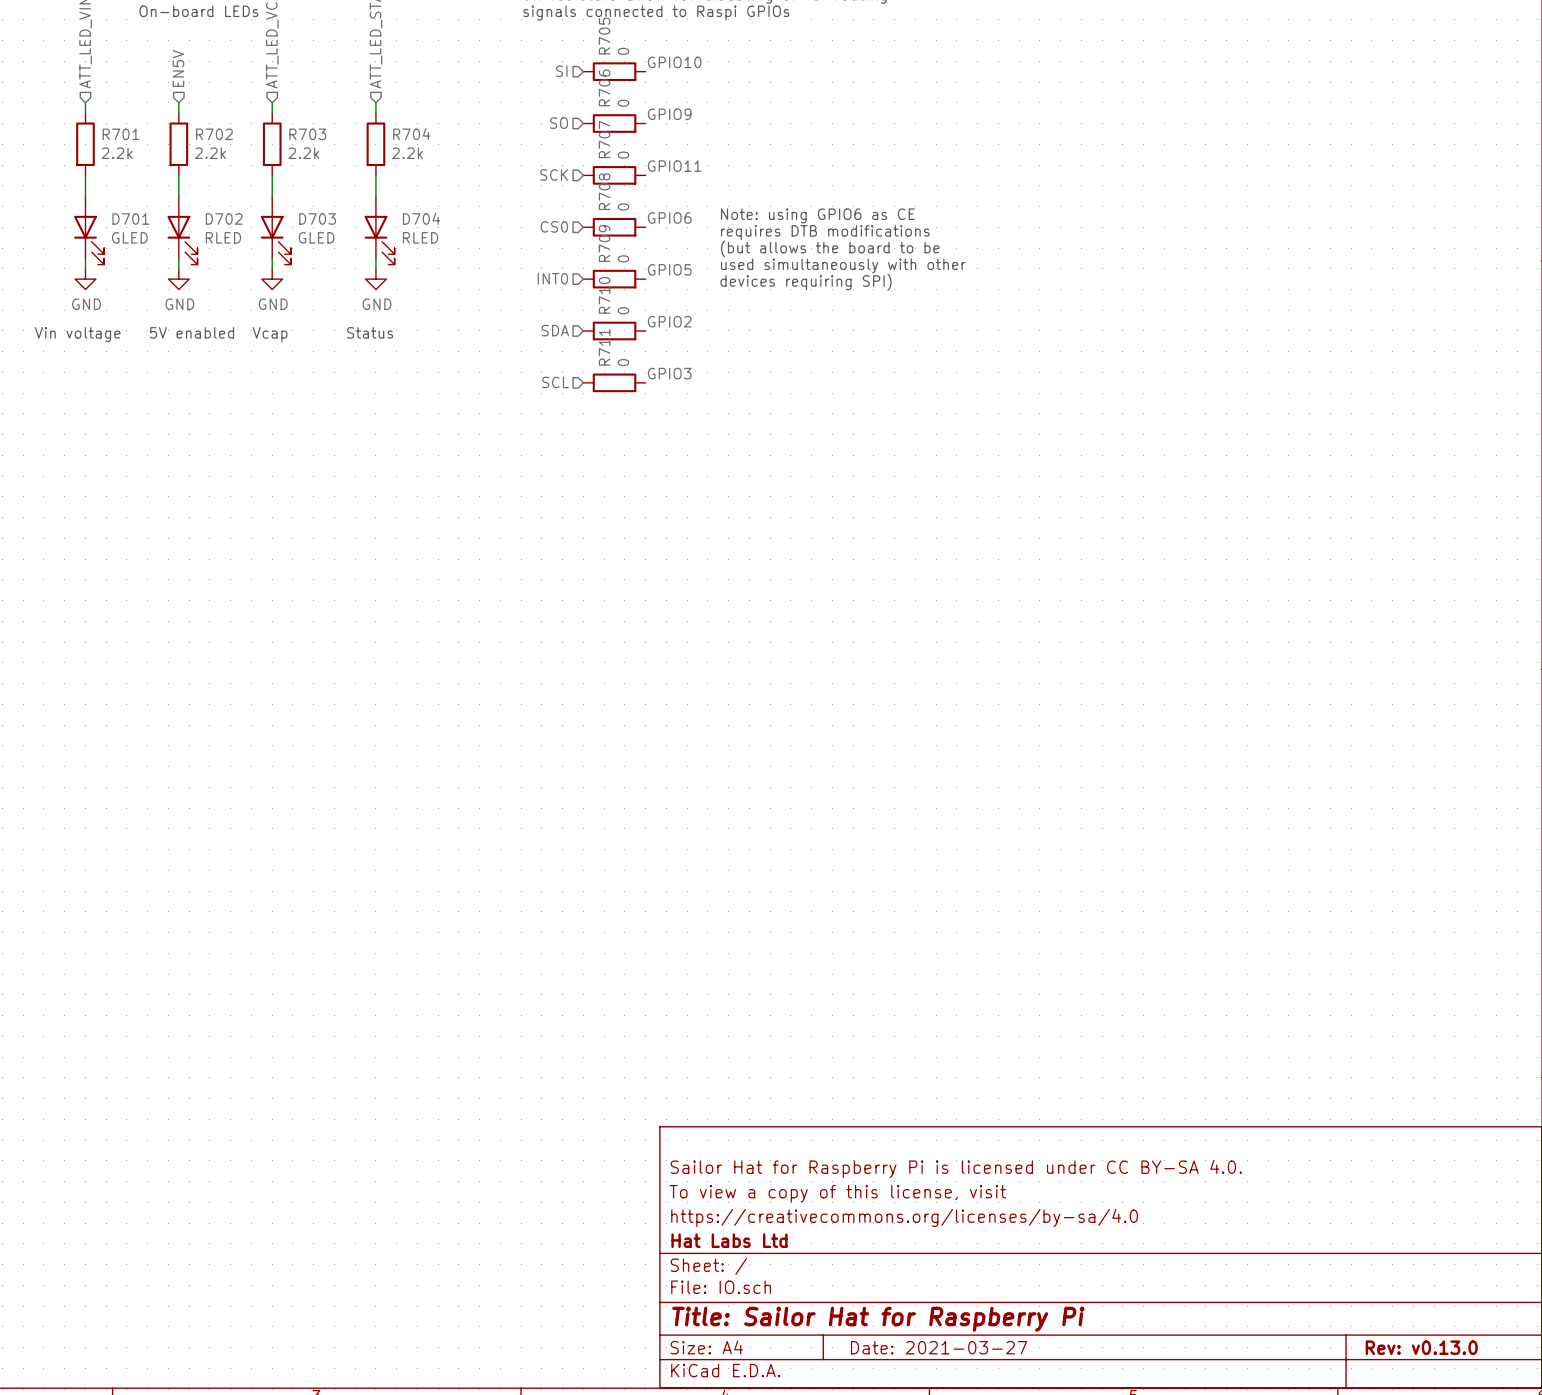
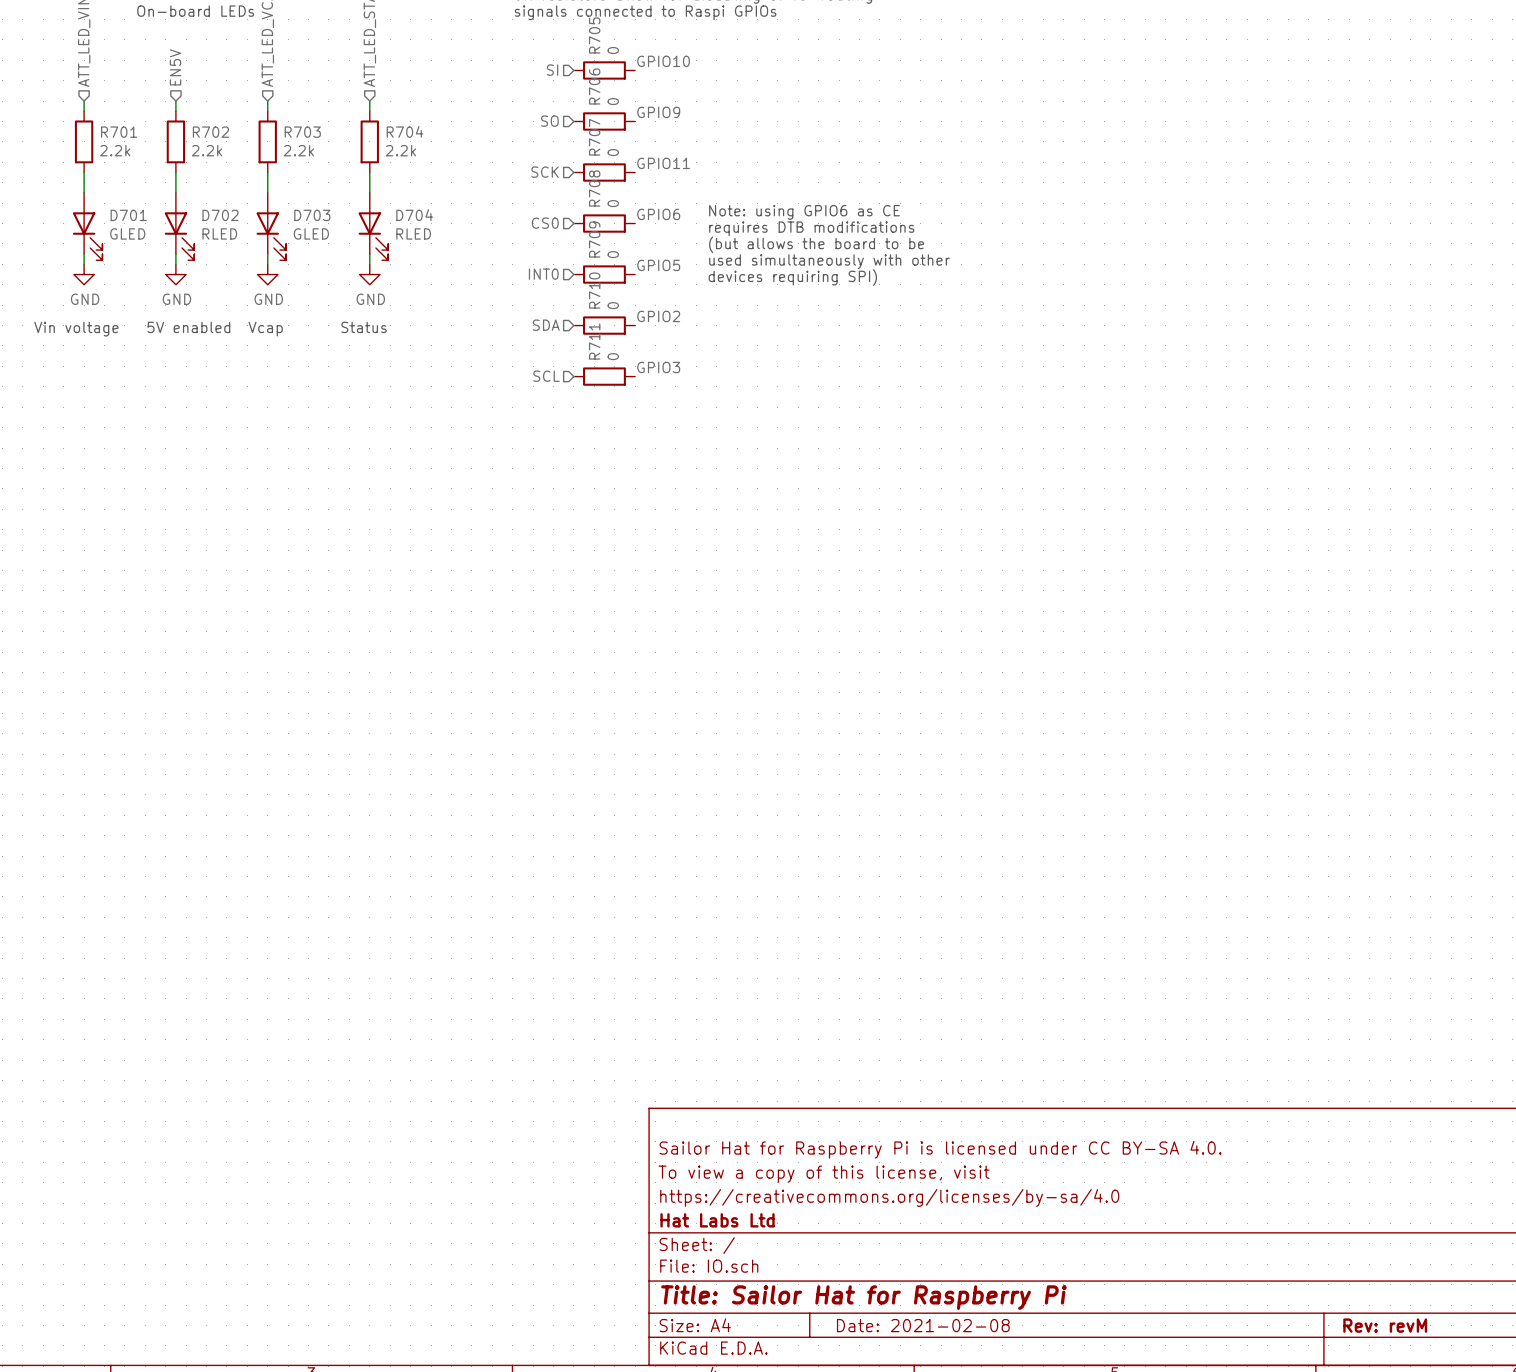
title block: Date: 2021-03-27 (939, 1347) -> Date: 2021-02-08 (923, 1325)
title block: Rev: v0.13.0 (1421, 1347) -> Rev: revM (1385, 1325)

